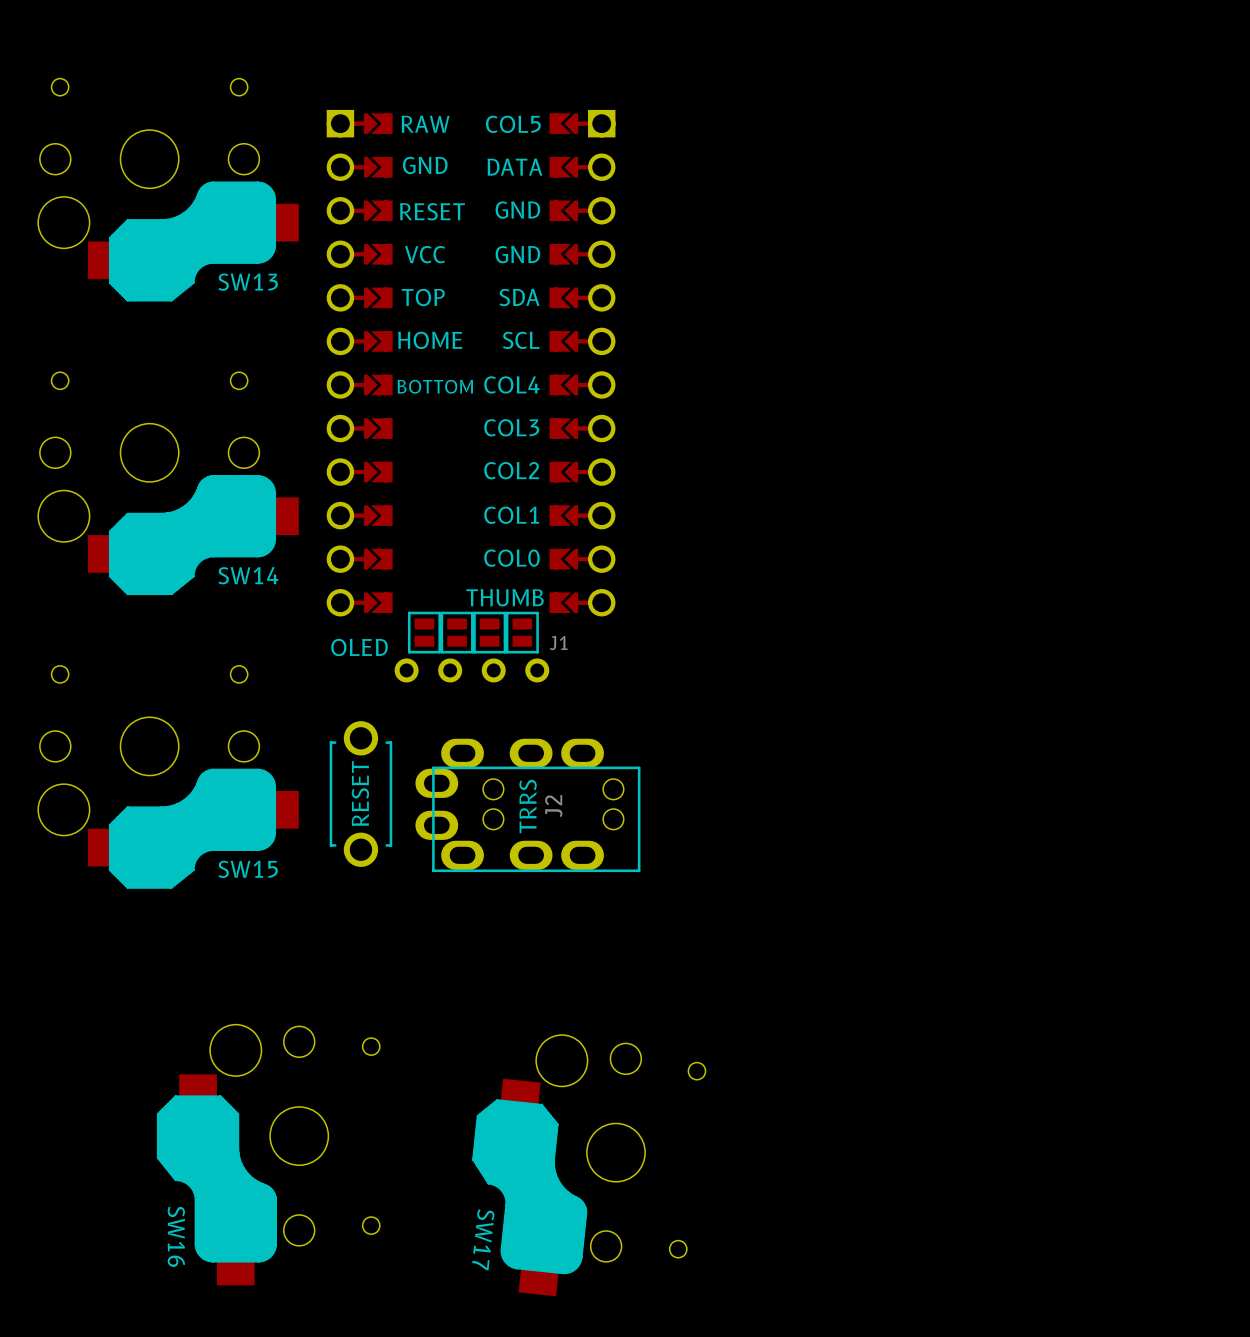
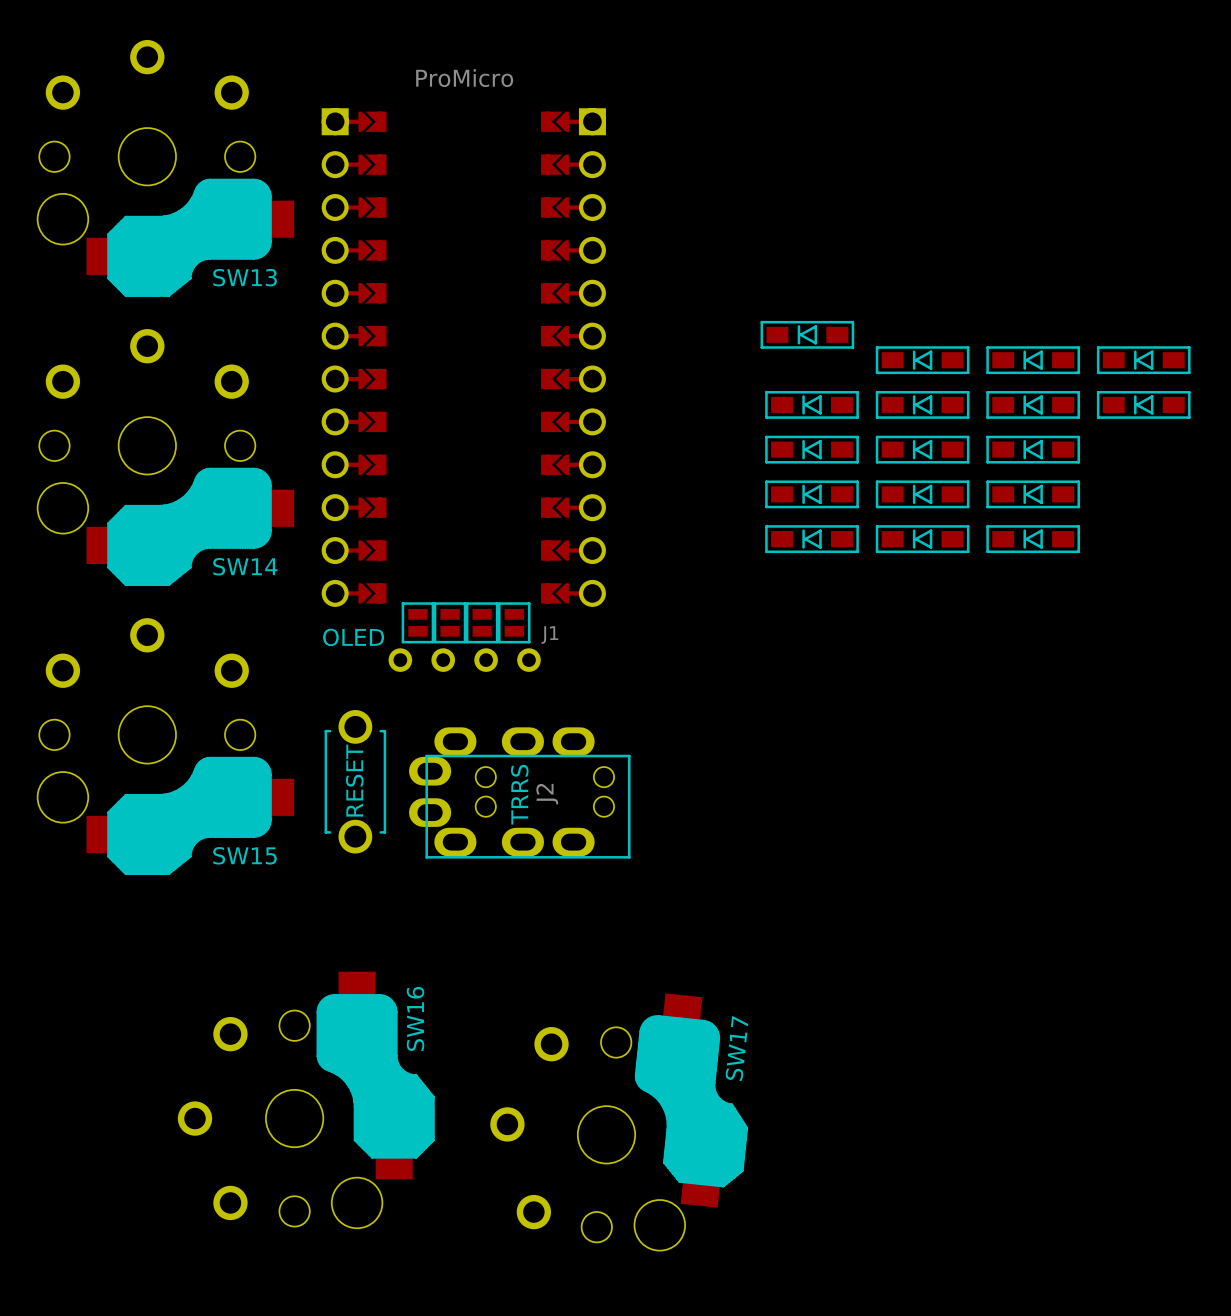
SW13 footprint: [38, 78, 299, 302] -> [37, 39, 295, 297]
part value: none -> ProMicro (464, 78)
part footprint: [326, 109, 616, 617] -> [321, 108, 606, 607]
part: none -> (807, 334)
part: none -> (922, 360)
part: none -> (1033, 360)
part: none -> (1143, 360)
SW14 footprint: [38, 372, 299, 596] -> [37, 329, 295, 586]
part: none -> (812, 404)
part: none -> (922, 404)
part: none -> (1033, 404)
part: none -> (1143, 404)
part: none -> (812, 449)
part: none -> (922, 449)
part: none -> (1033, 449)
part: none -> (812, 494)
part: none -> (922, 494)
part: none -> (1033, 494)
part: none -> (812, 539)
part: none -> (922, 539)
part: none -> (1033, 539)
SW15 footprint: [38, 665, 299, 889] -> [37, 618, 295, 875]
SW16 footprint: [156, 1024, 380, 1286] -> [177, 971, 435, 1229]
SW17 footprint: [472, 1035, 706, 1297] -> [490, 993, 749, 1251]
SW16 name position: SW16 (176, 1236) -> SW16 (415, 1018)
SW17 name position: SW17 (483, 1239) -> SW17 (736, 1048)

